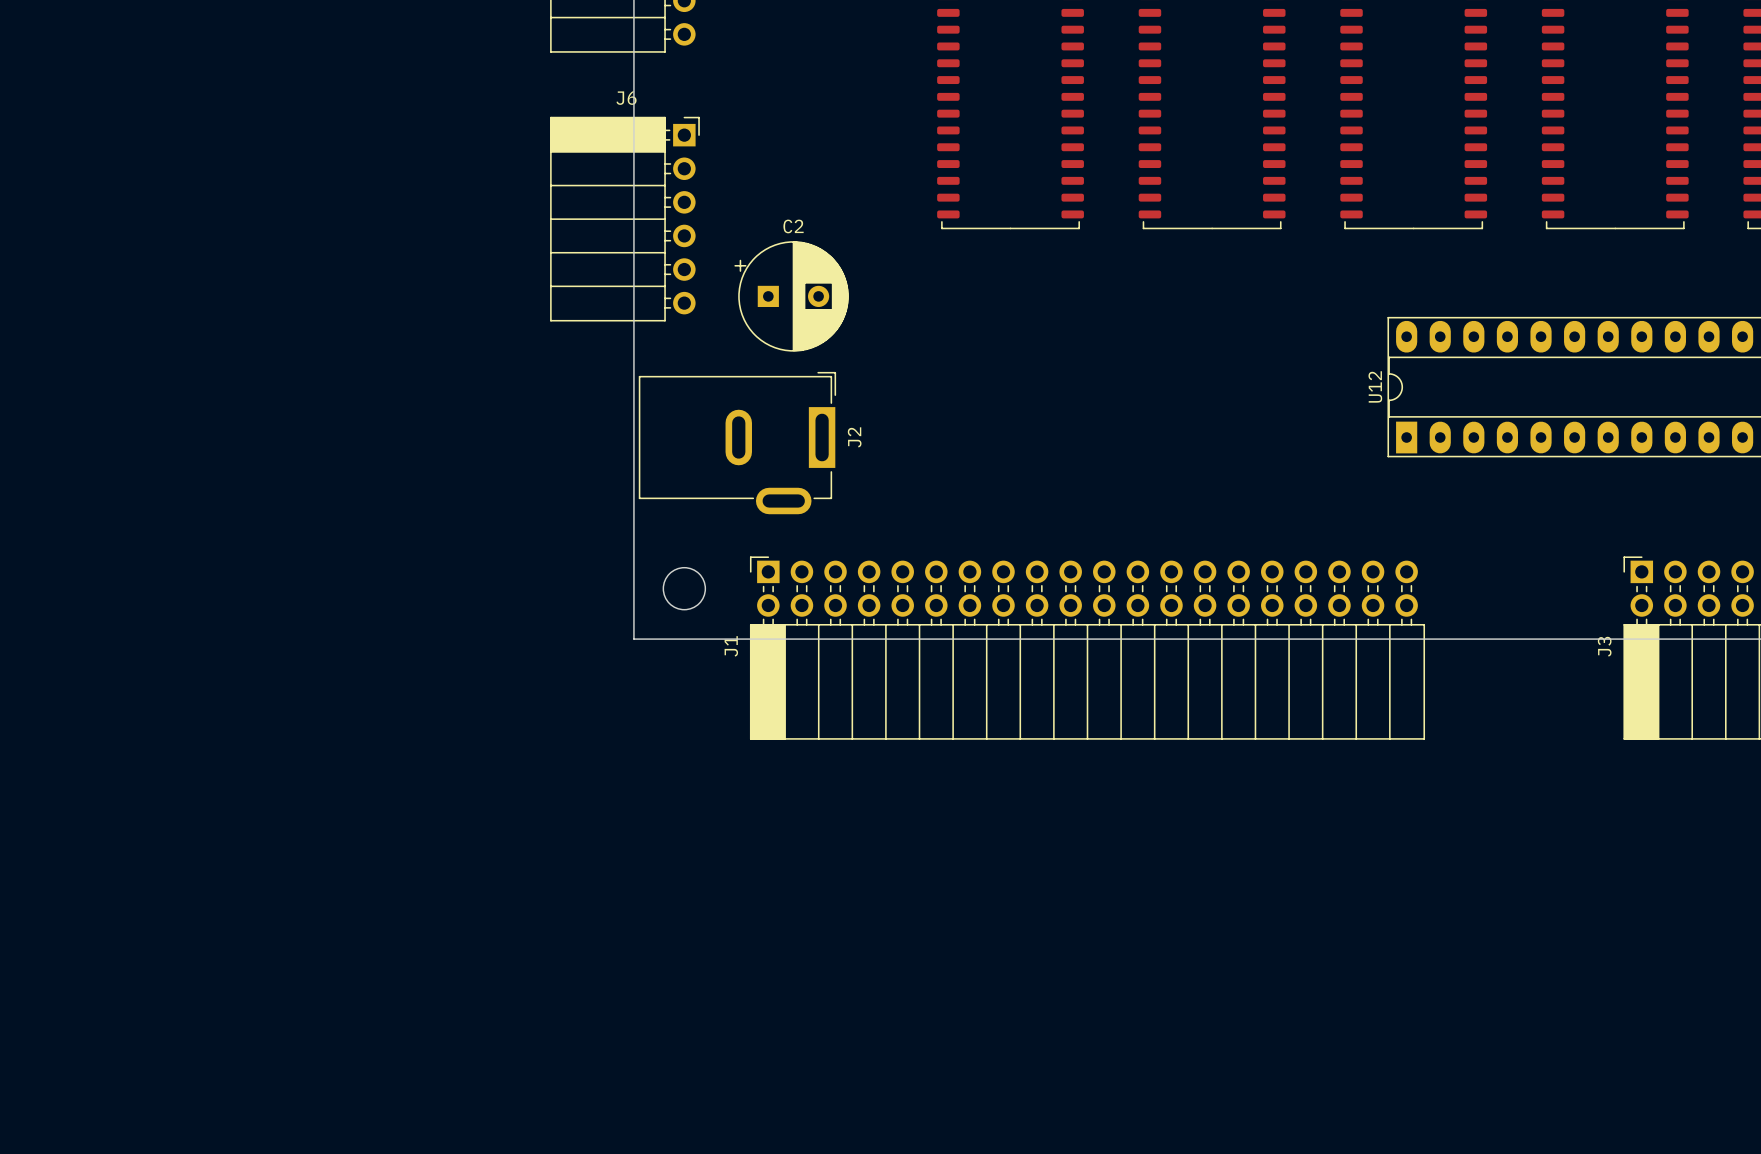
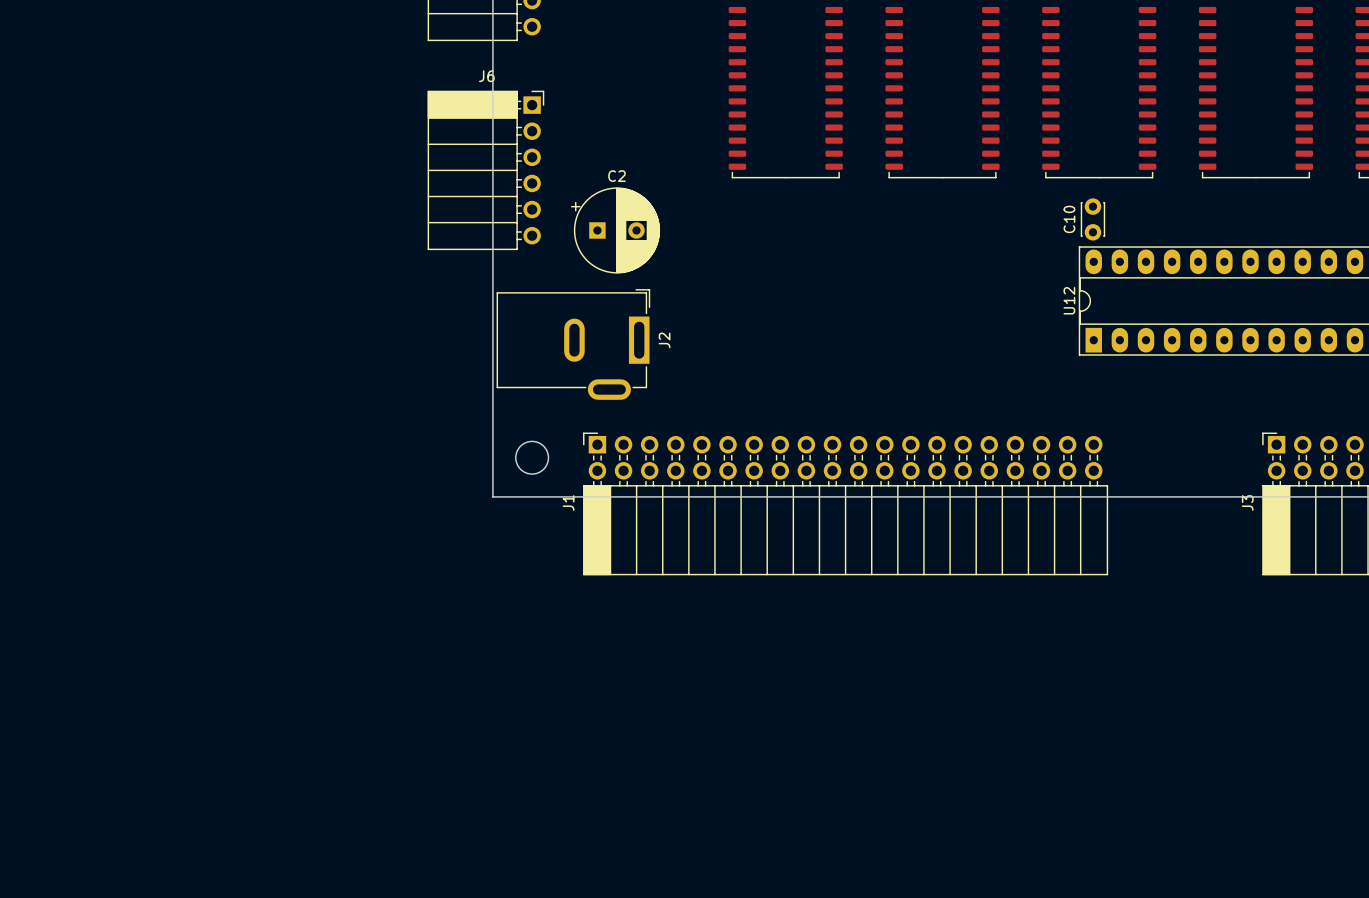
C10: none -> (1092, 219)

